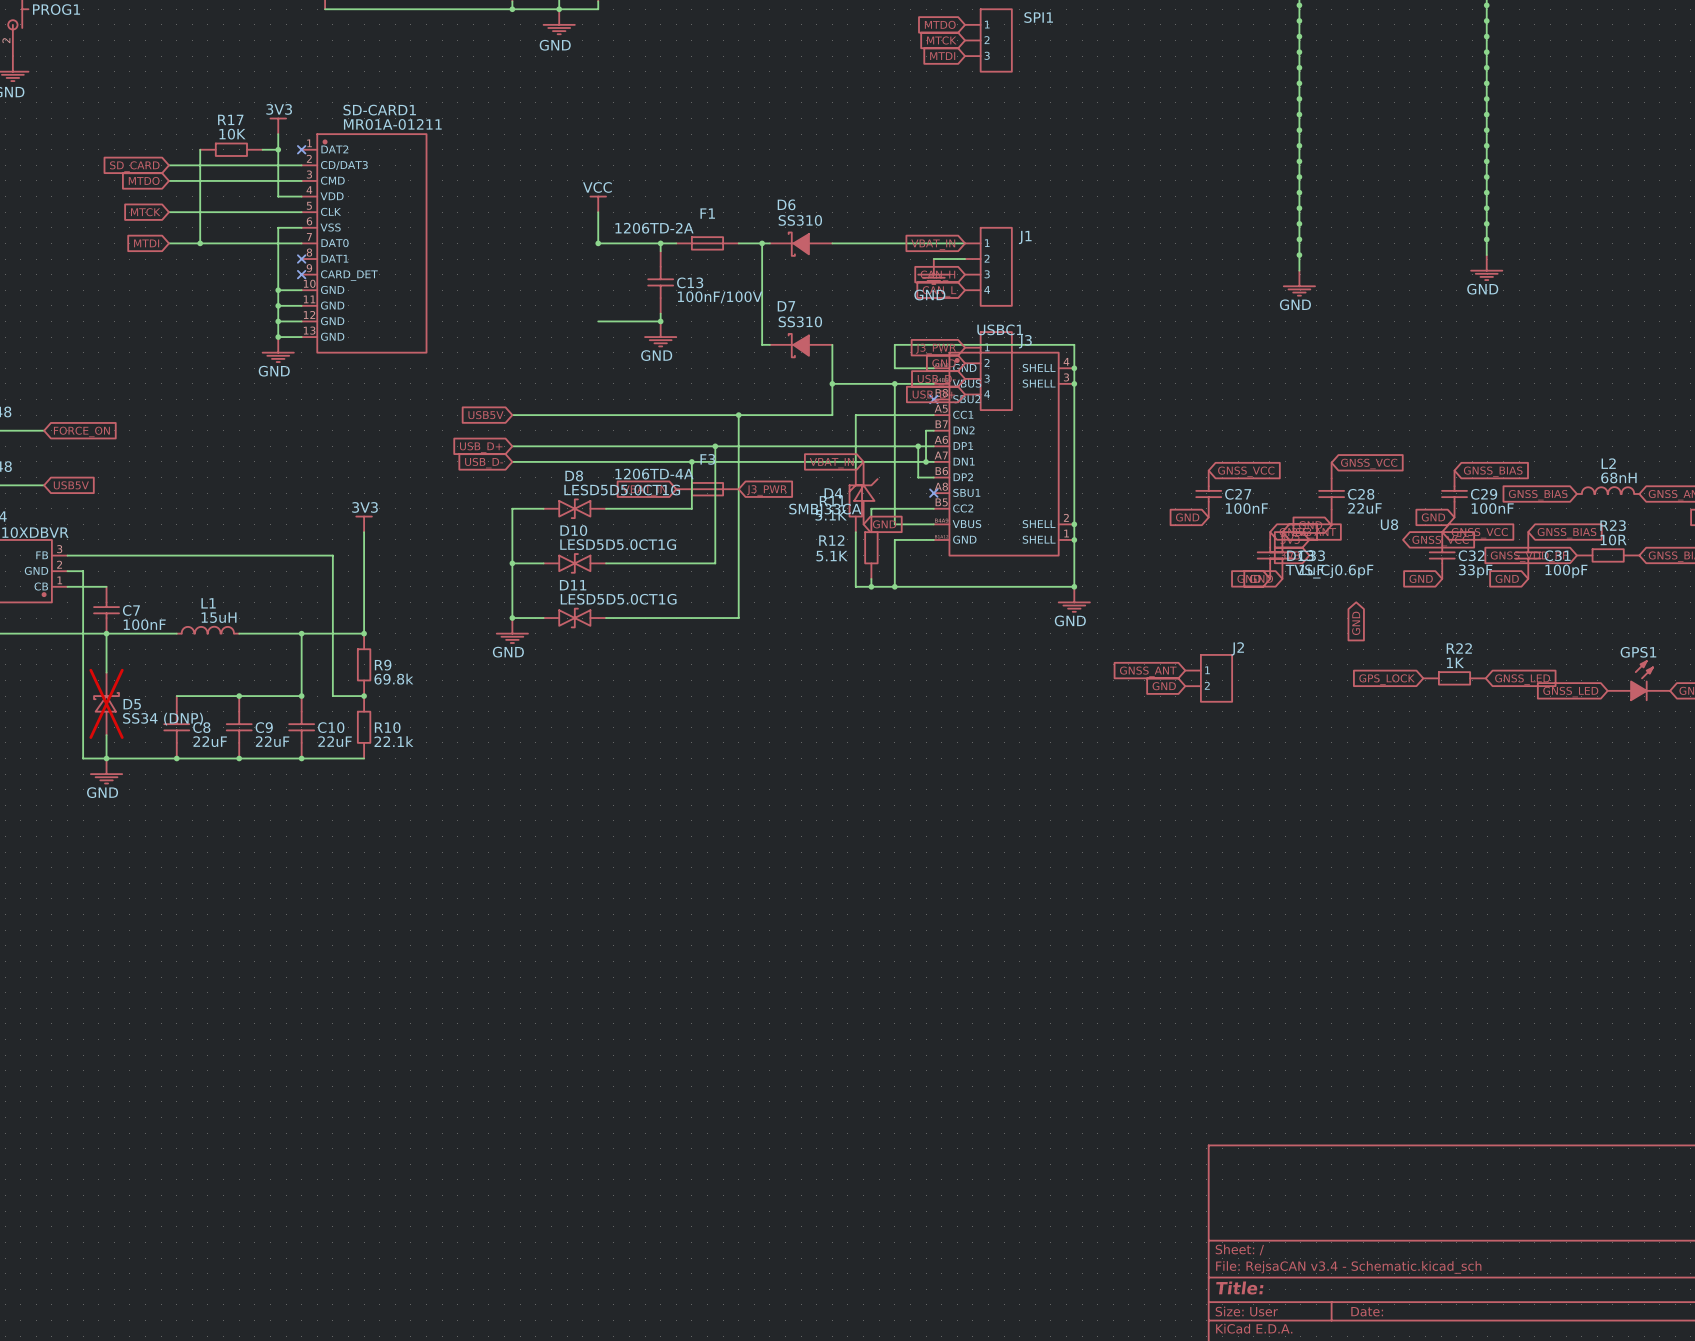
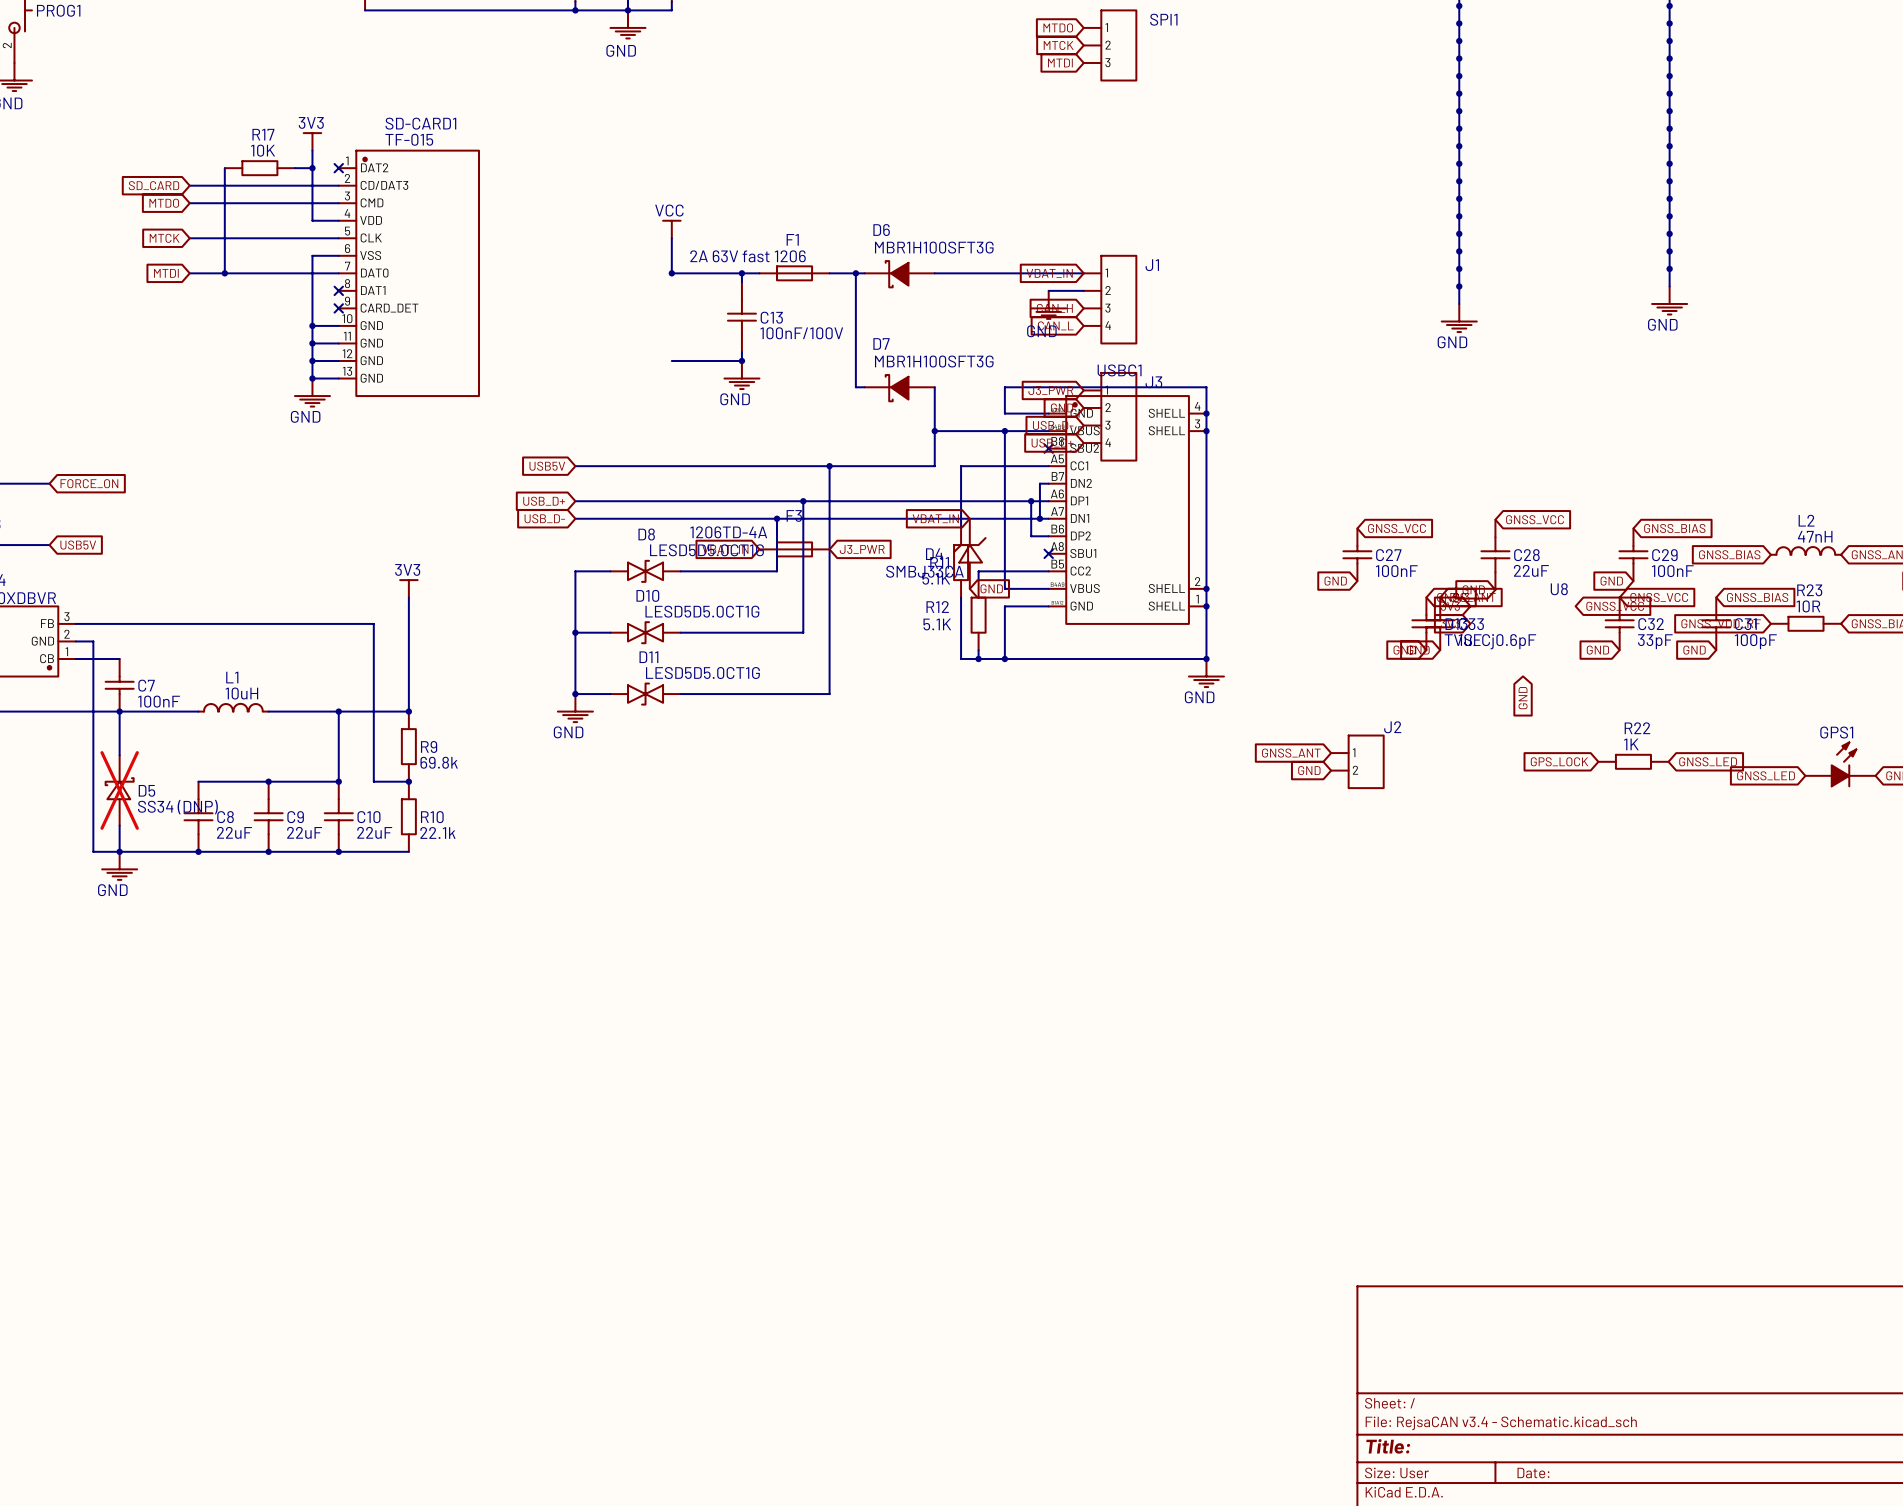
SD-CARD1 value: MR01A-01211 (392, 124) -> TF-015 (409, 139)
D6 value: SS310 (800, 220) -> MBR1H100SFT3G (934, 247)
F1 value: 1206TD-2A (654, 228) -> 2A 63V fast 1206 (748, 256)
D7 value: SS310 (800, 321) -> MBR1H100SFT3G (934, 361)
L2 value: 68nH (1618, 477) -> 47nH (1815, 536)
L1 value: 15uH (219, 617) -> 10uH (241, 693)

